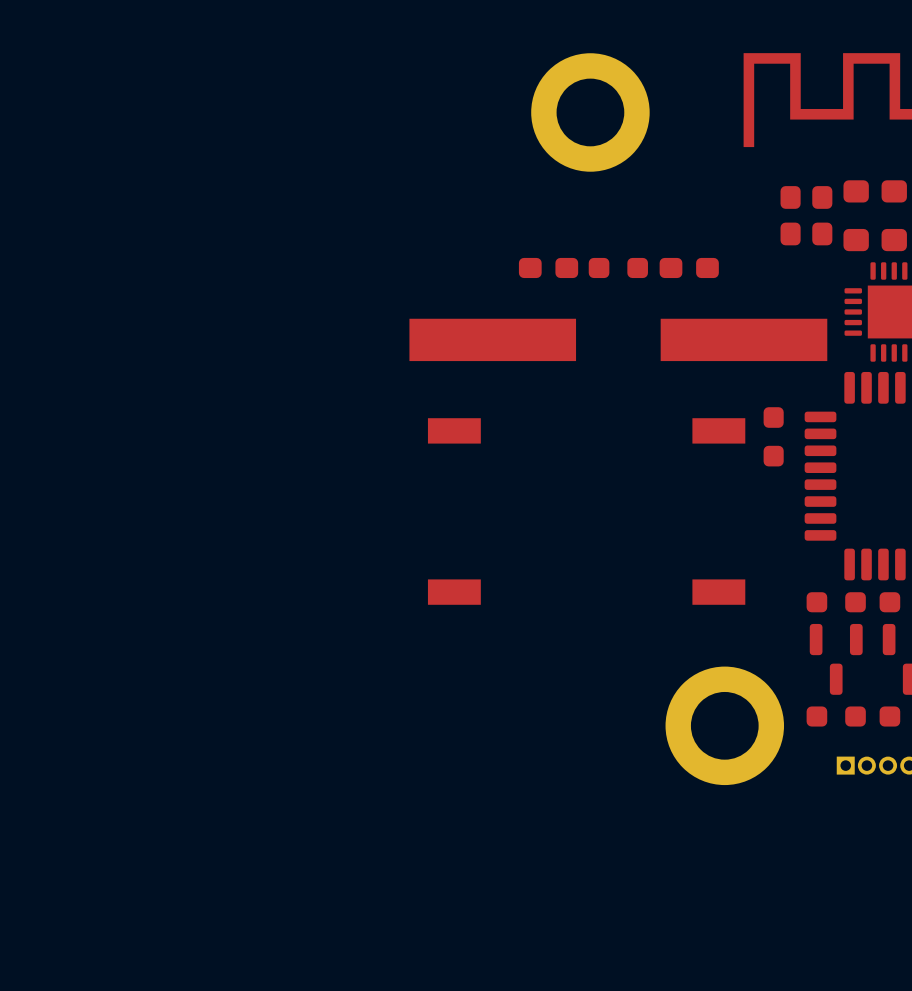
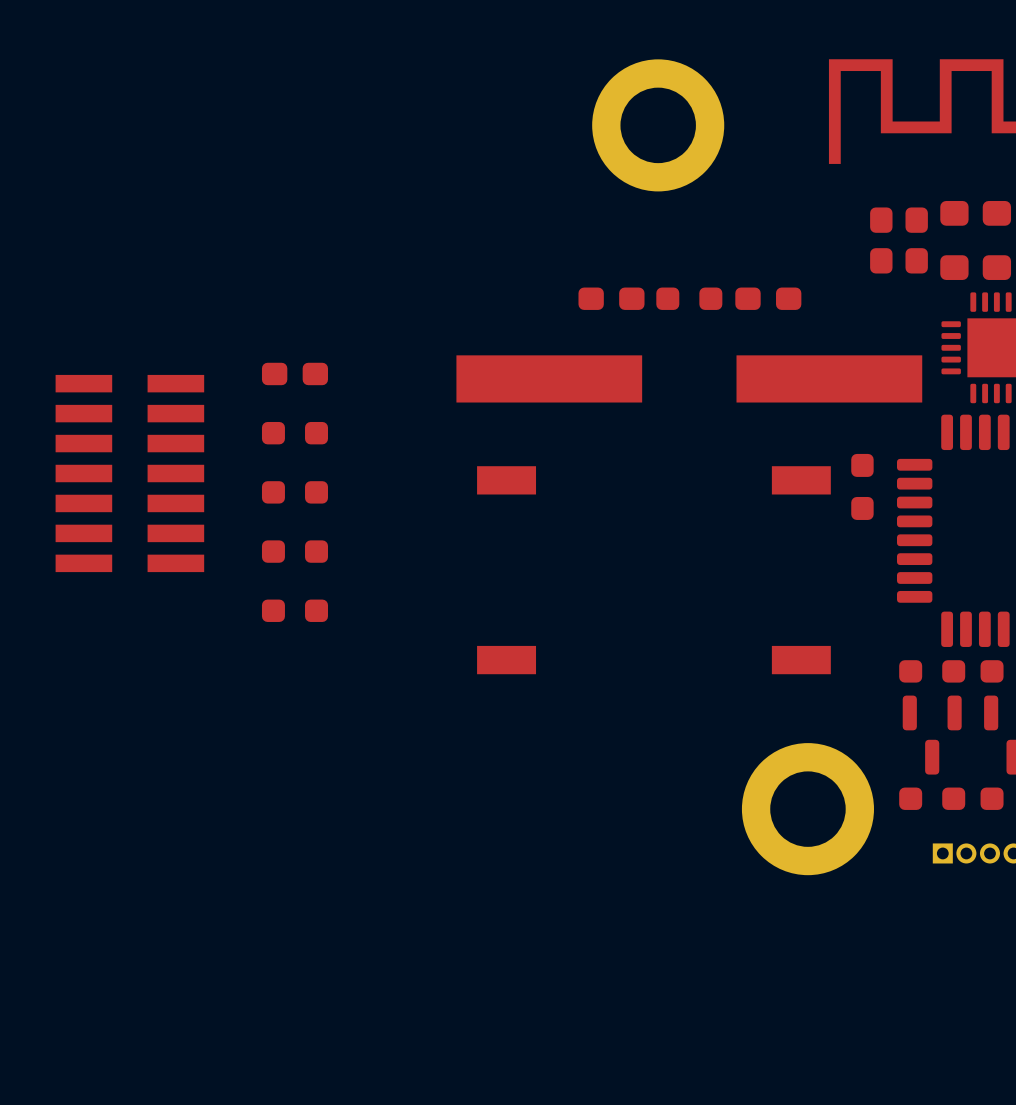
part: none -> (294, 373)
part: none -> (294, 433)
part: none -> (129, 473)
part: none -> (294, 492)
part: none -> (294, 551)
part: none -> (294, 610)

